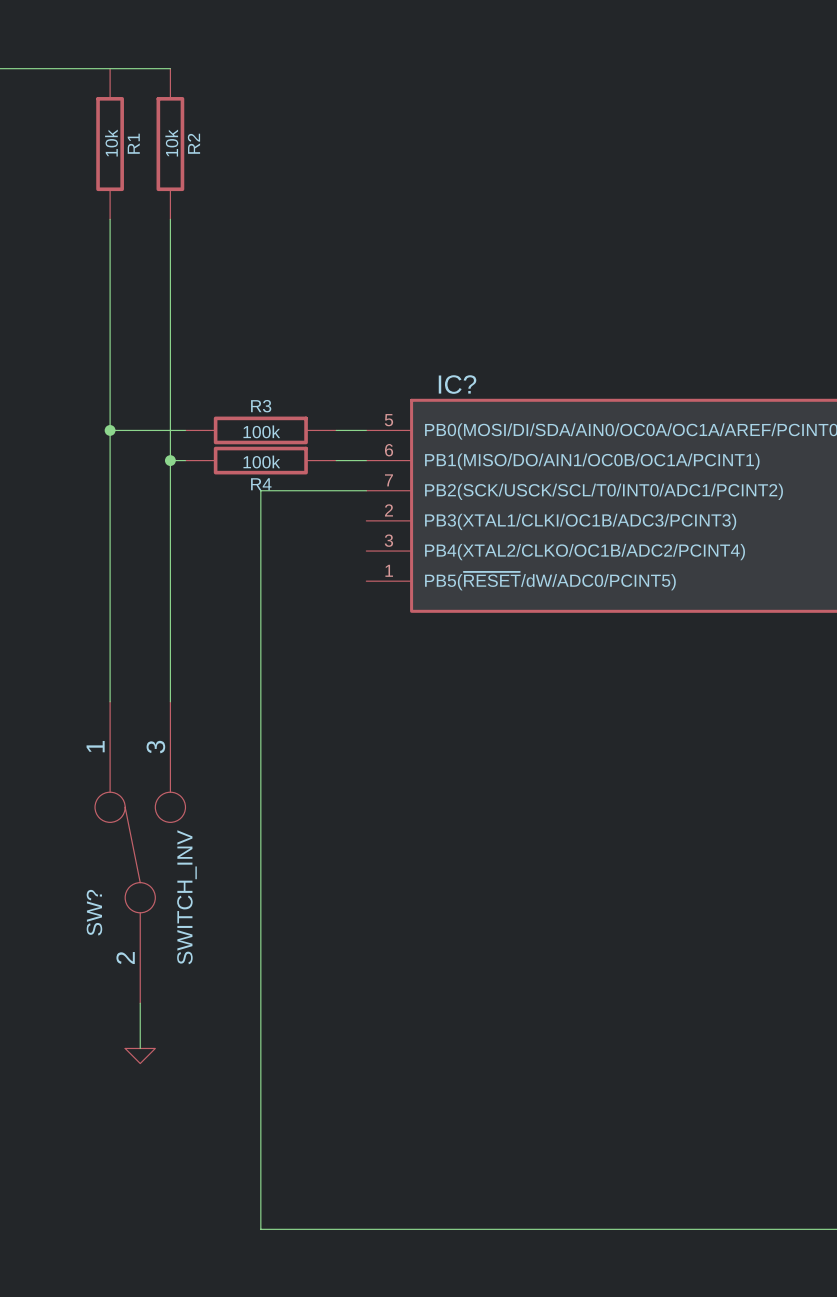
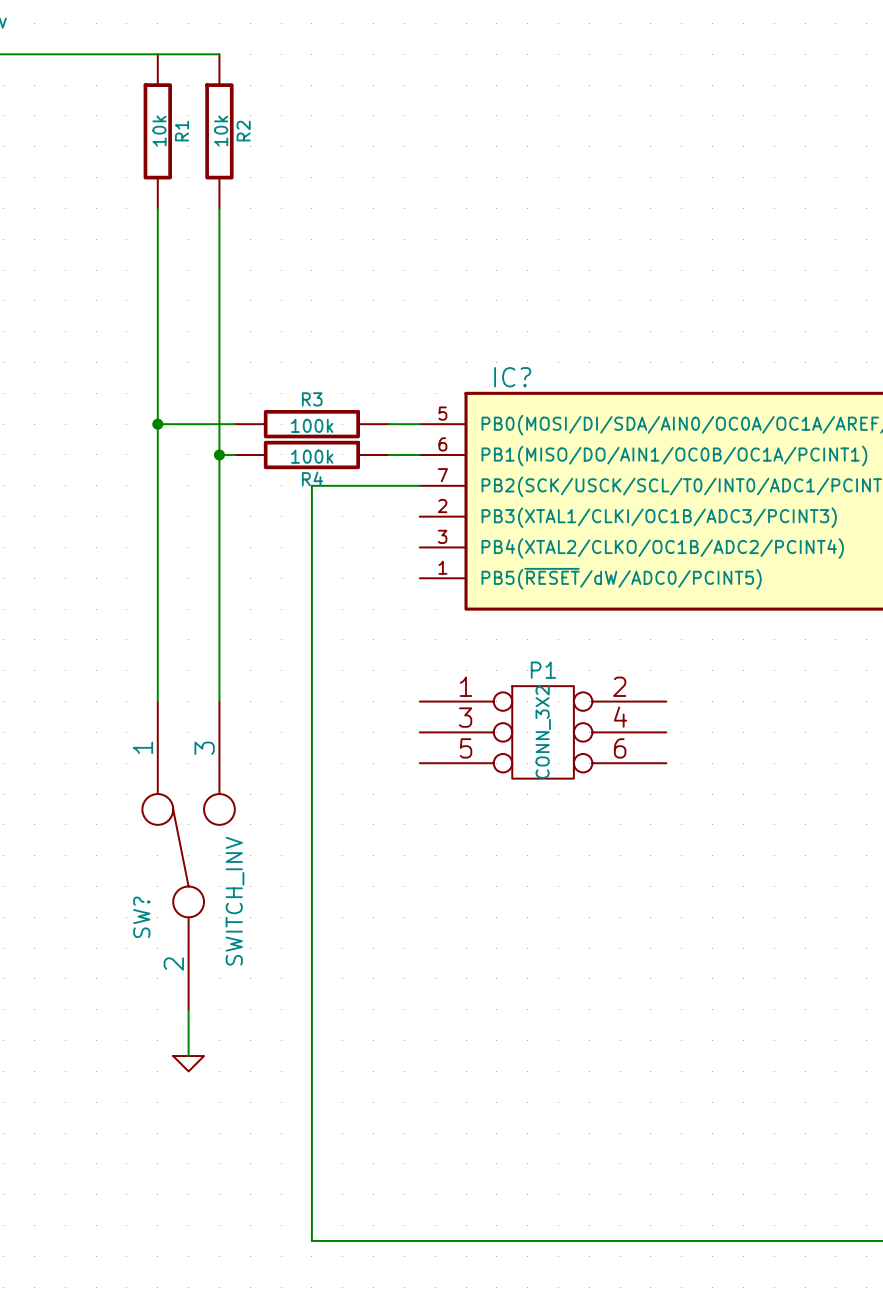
P1: none -> CONN_3X2 (543, 732)

